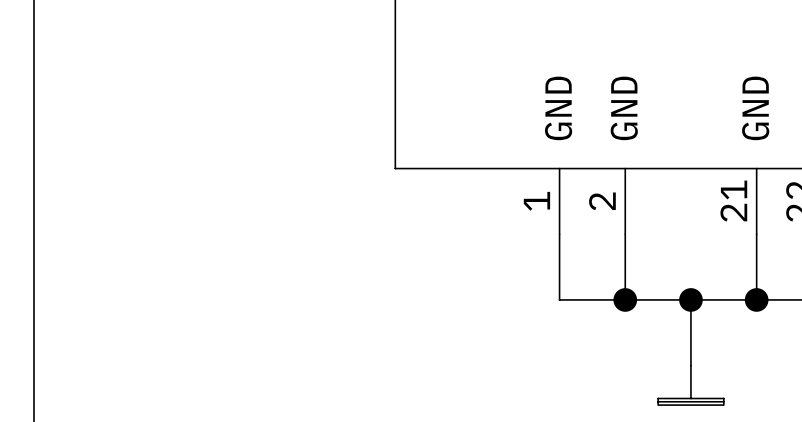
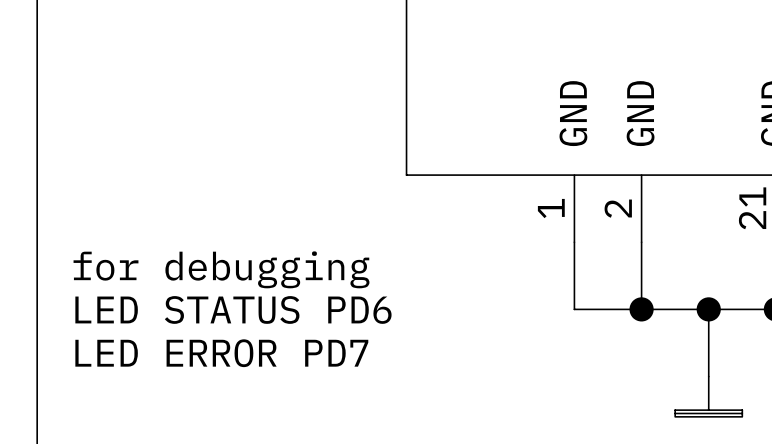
text: none -> for debugging (221, 269)
text: none -> LED STATUS PD6 (233, 309)
text: none -> LED ERROR PD7 (221, 353)

